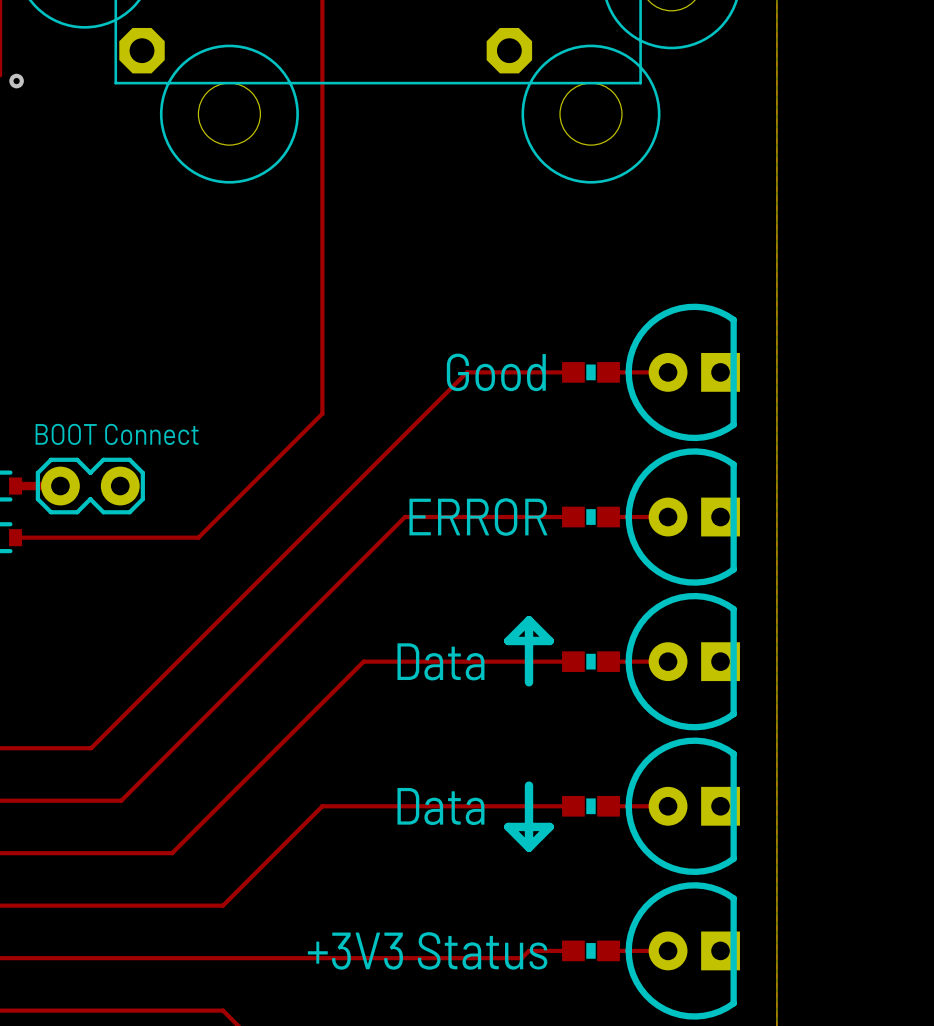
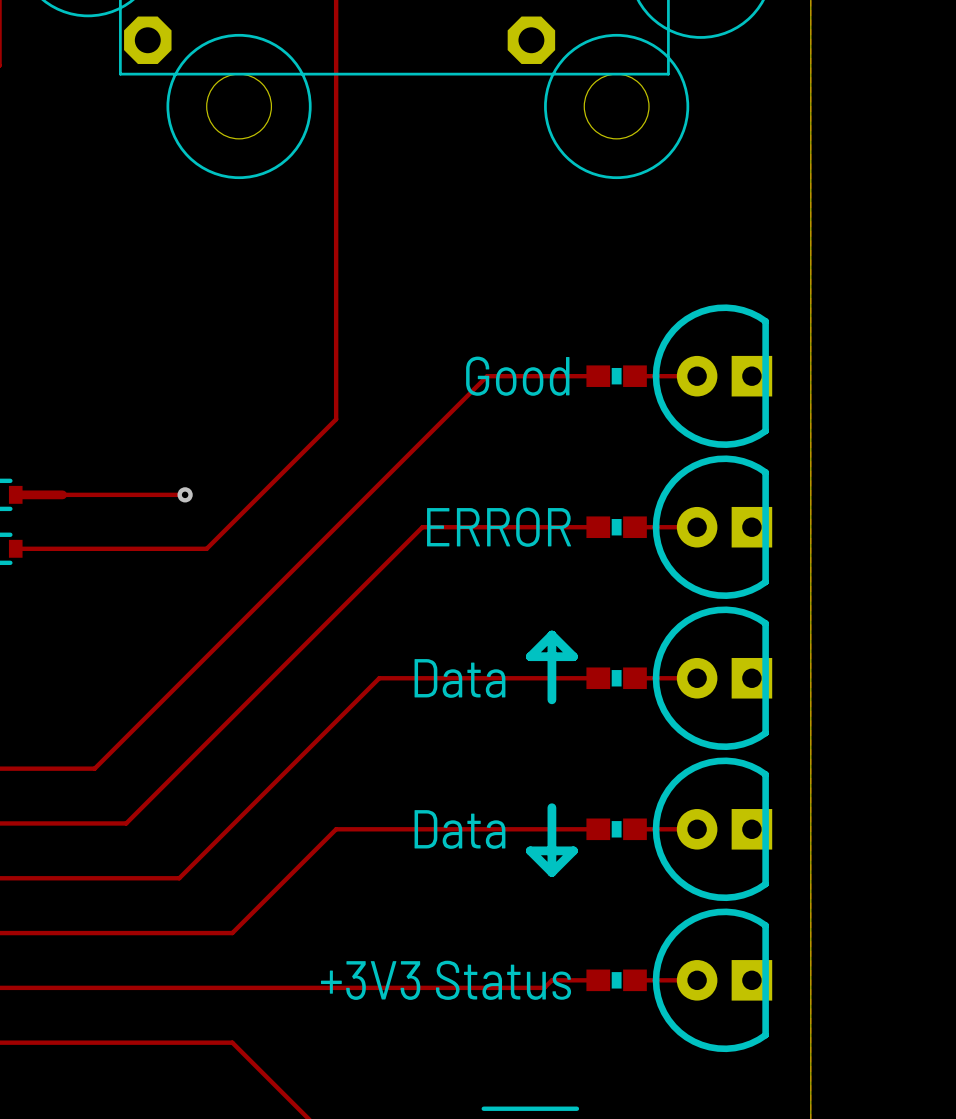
via: (16, 81) -> none
text: BOOT Connect (117, 434) -> none
track: none -> (62, 494) (185, 494)
part: (90, 486) -> none
via: none -> (185, 494)

